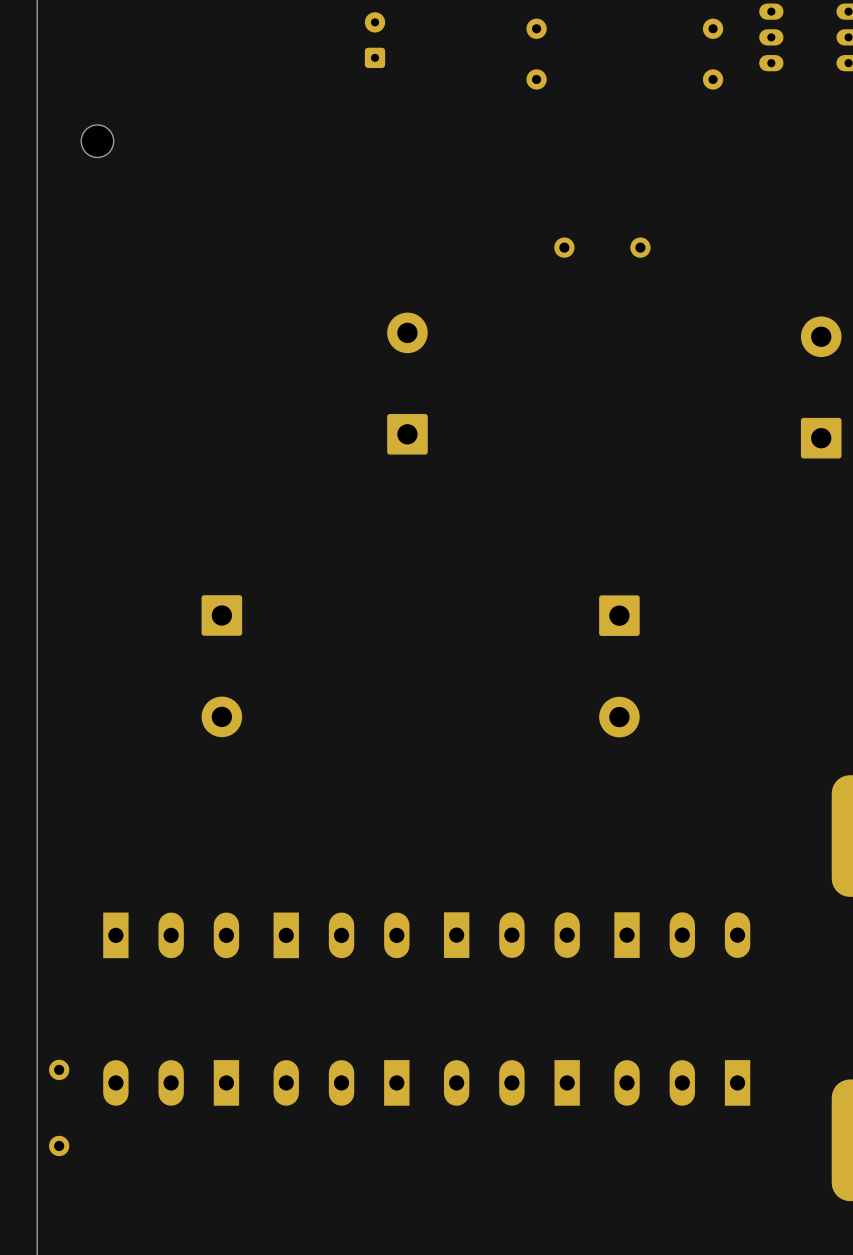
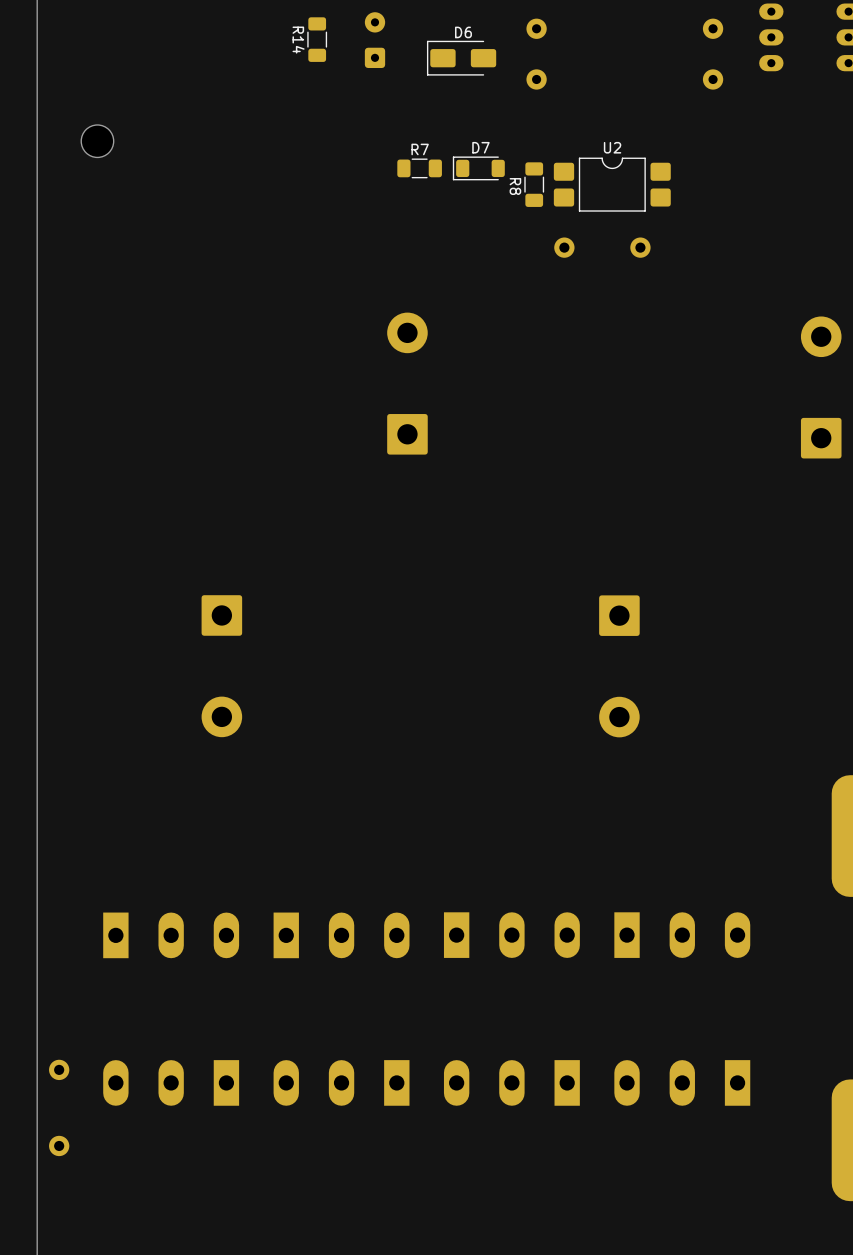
R14: none -> (317, 39)
D6: none -> (461, 58)
R7: none -> (419, 168)
D7: none -> (478, 168)
R8: none -> (534, 184)
U2: none -> (612, 184)

